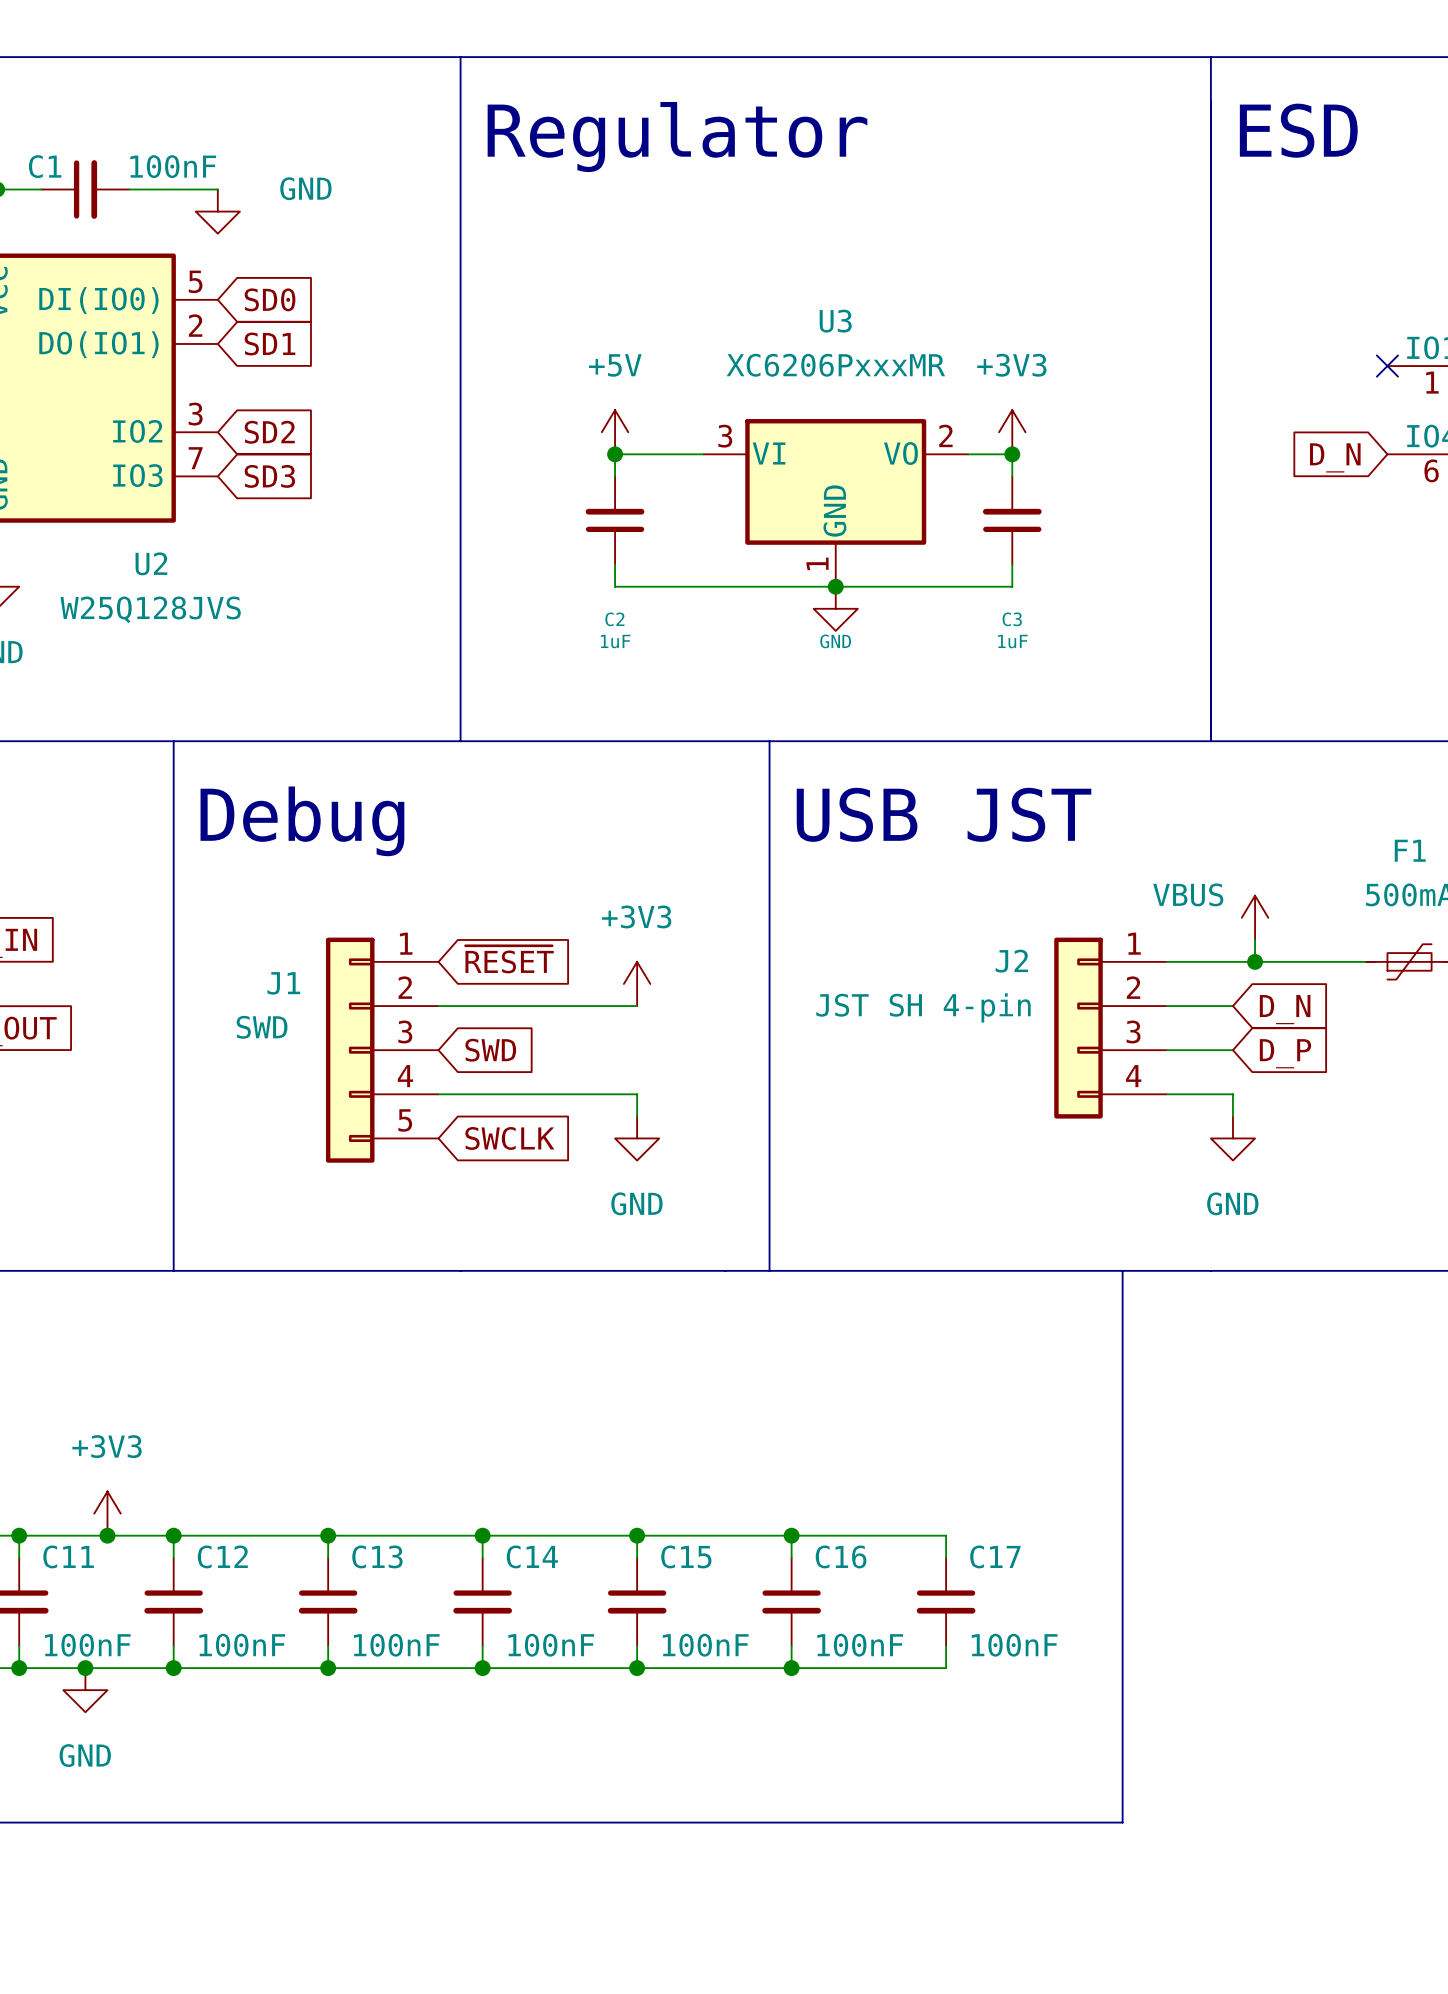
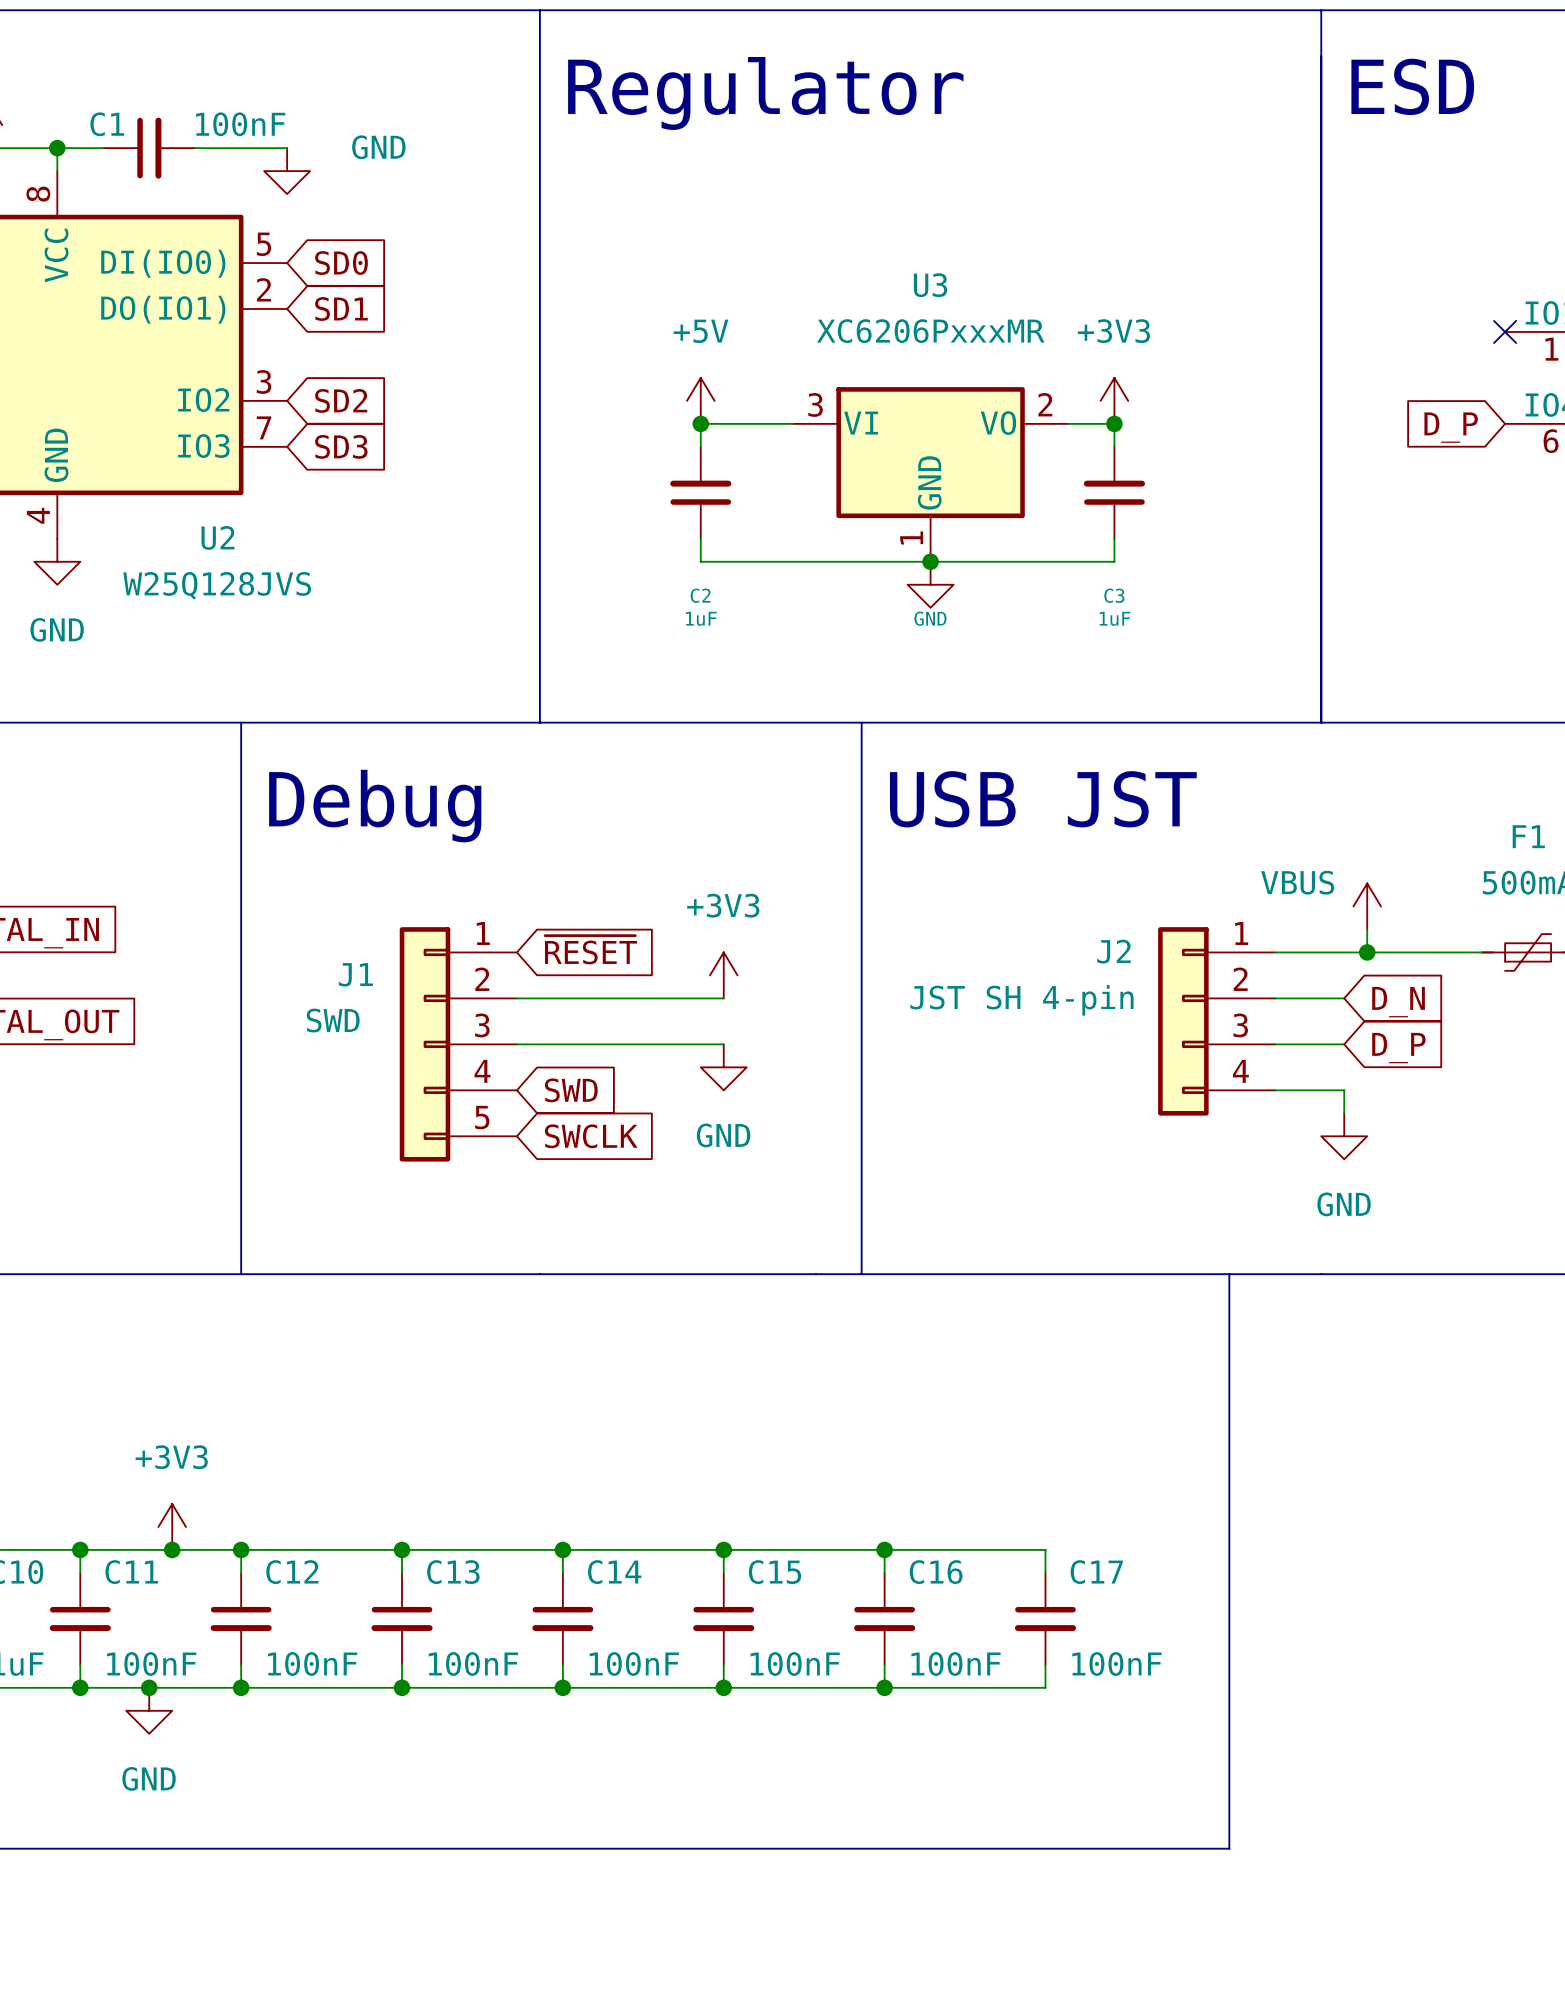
global label: D_N (1335, 457) -> D_P (1451, 427)
wire: none -> (516, 1044) (723, 1044)
global label position: SWD (490, 1050) -> SWD (571, 1090)
wire: (438, 1094) (637, 1094) (637, 1116) -> none
power symbol position: GND (637, 1138) -> GND (723, 1067)

